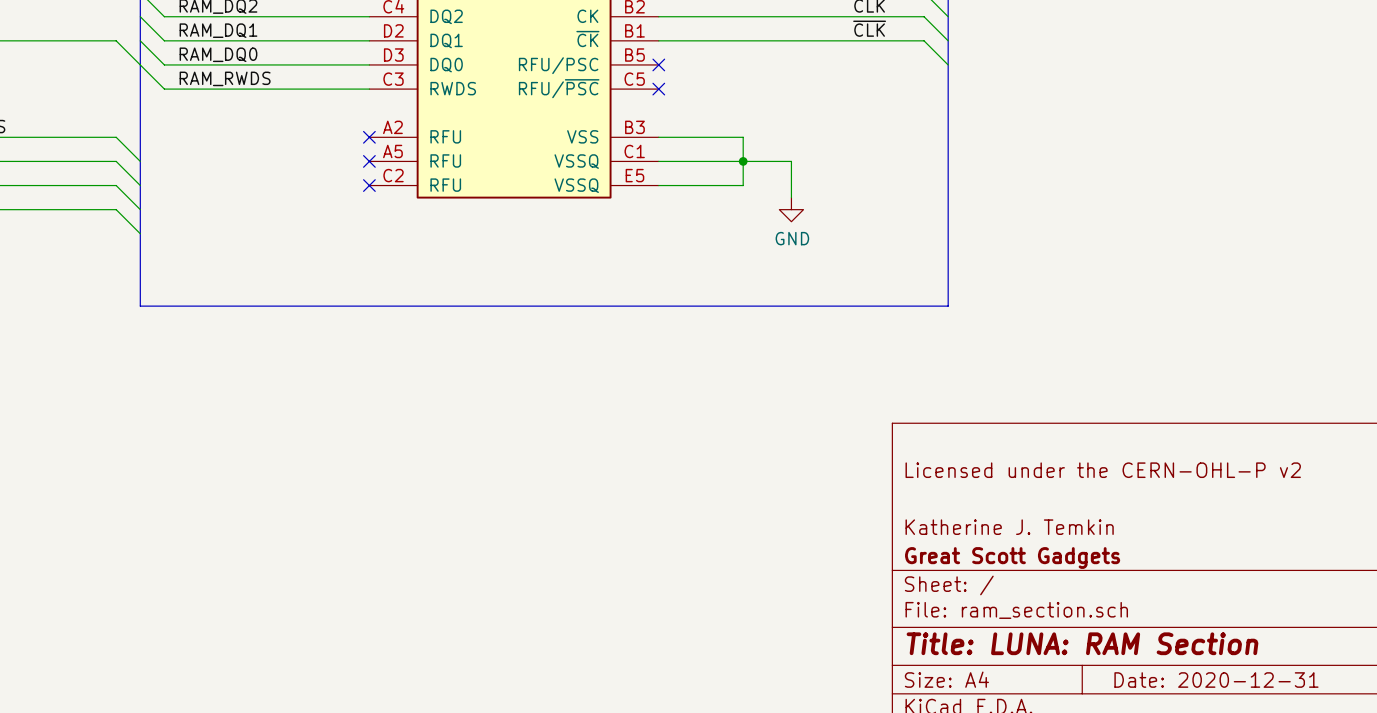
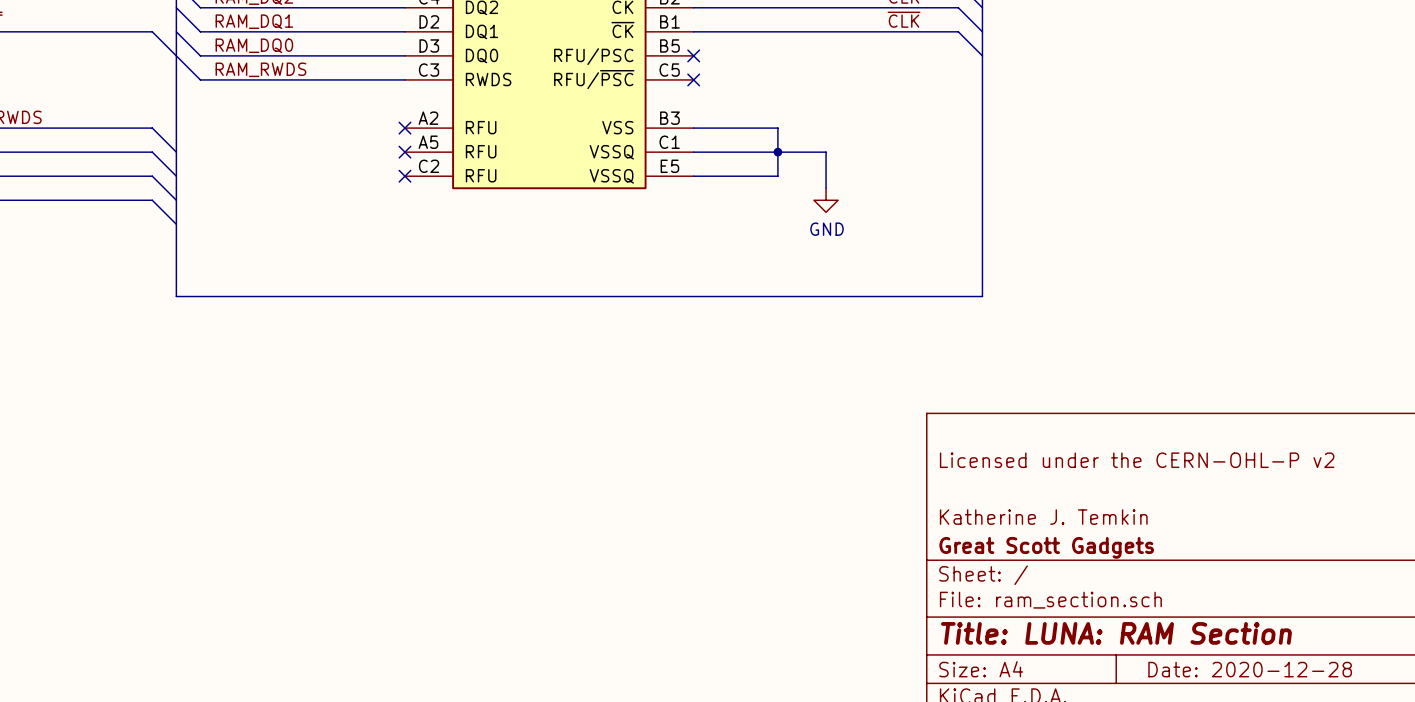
title block: Date: 2020-12-31 (1216, 680) -> Date: 2020-12-28 (1250, 669)

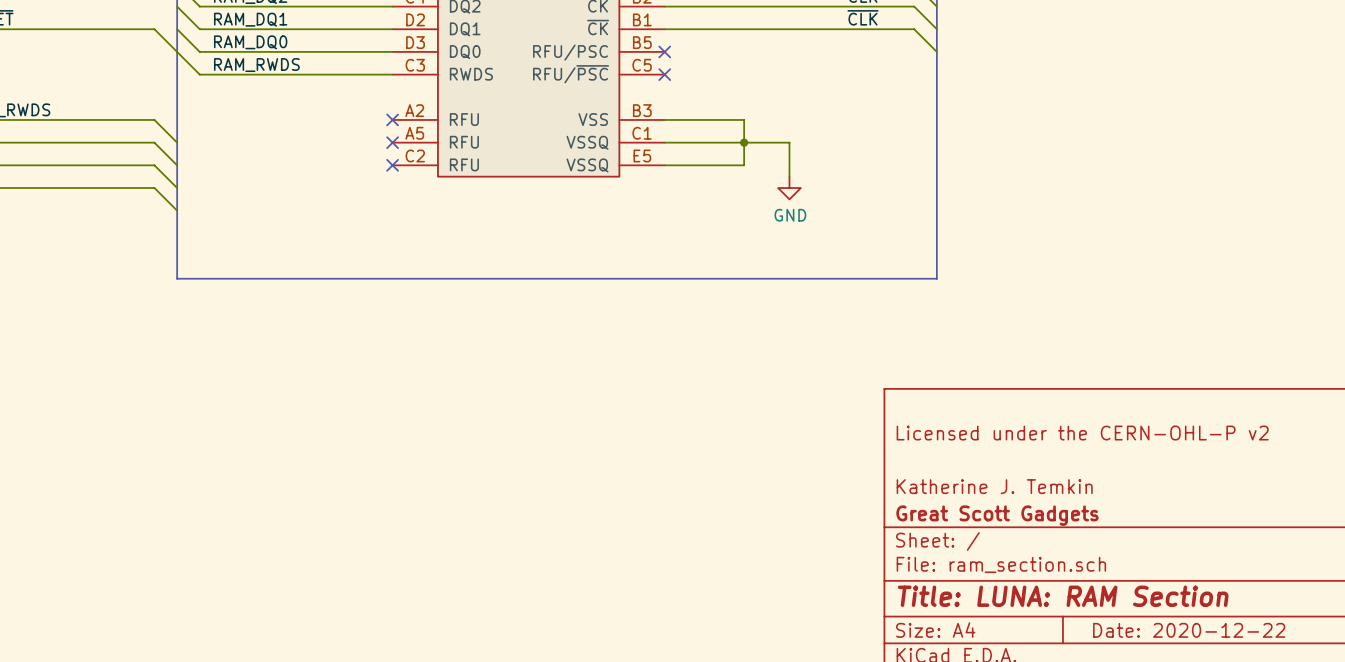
title block: Date: 2020-12-28 (1250, 669) -> Date: 2020-12-22 (1189, 630)

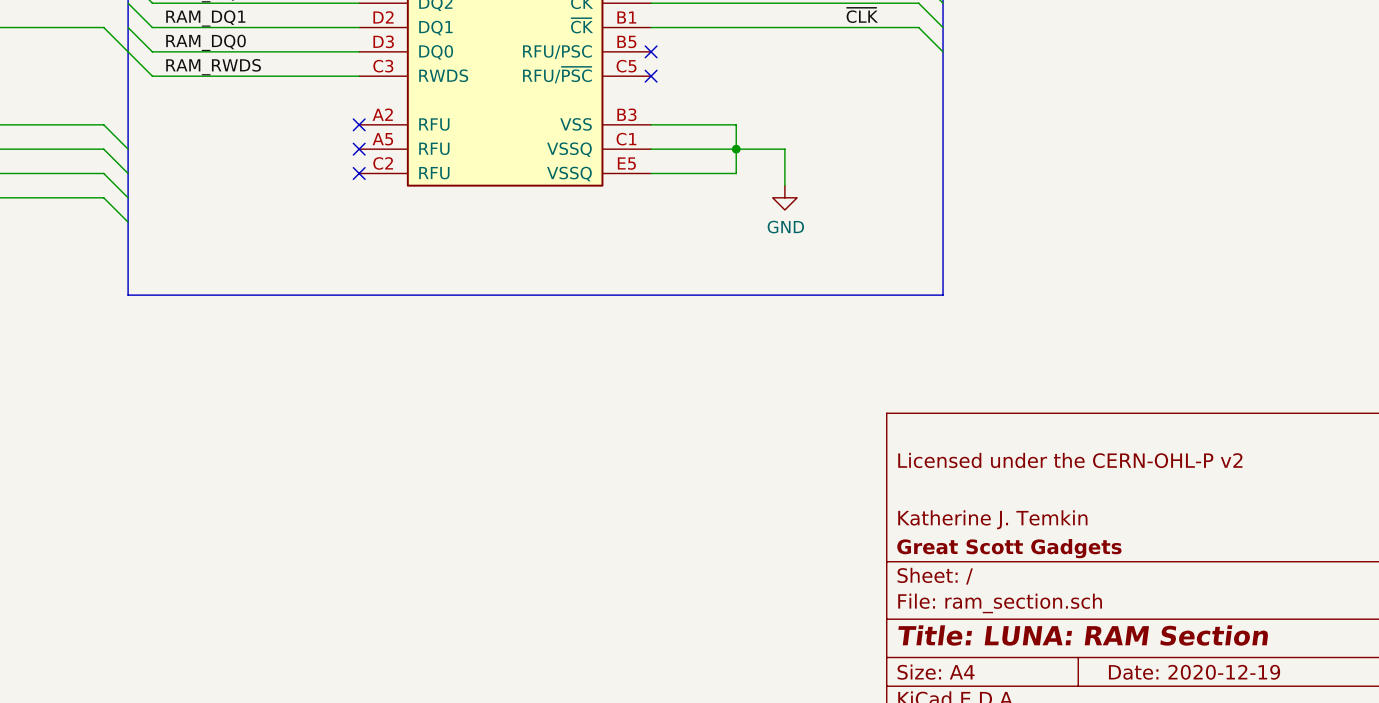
title block: Date: 2020-12-22 (1189, 630) -> Date: 2020-12-19 (1194, 672)

